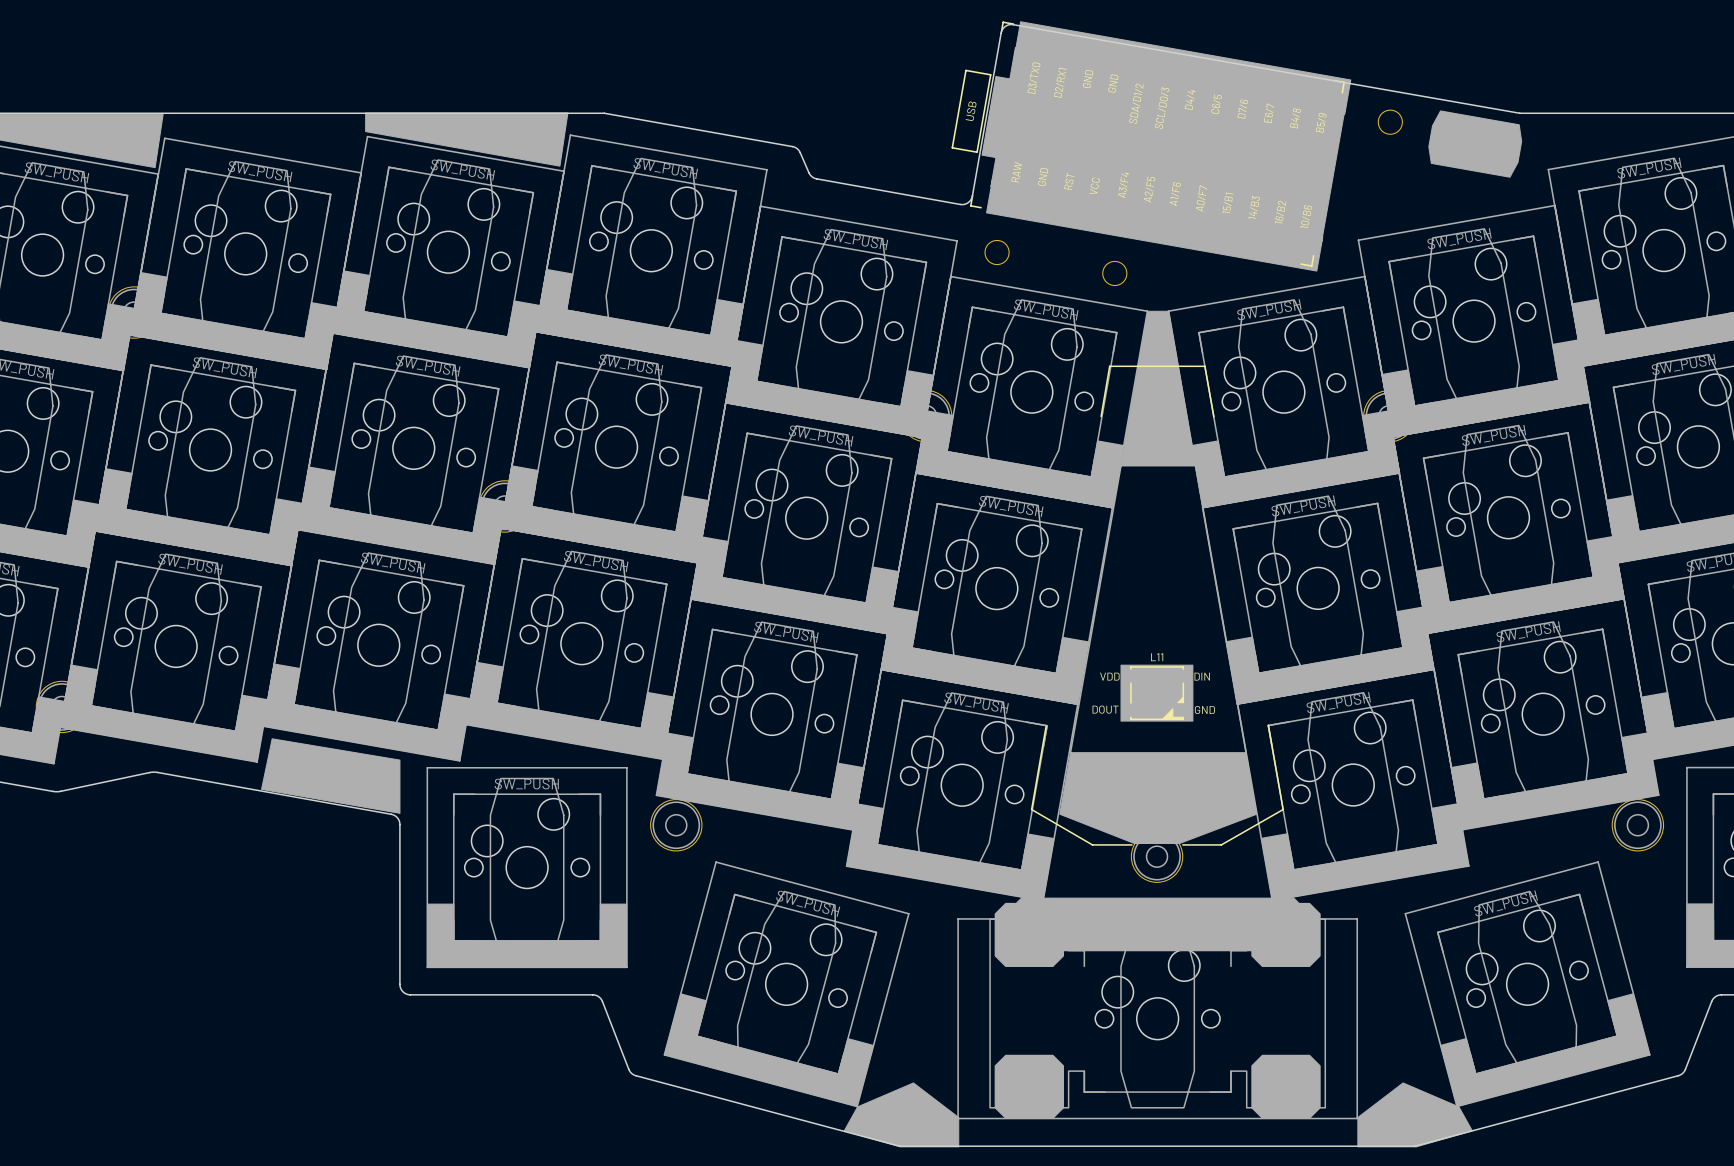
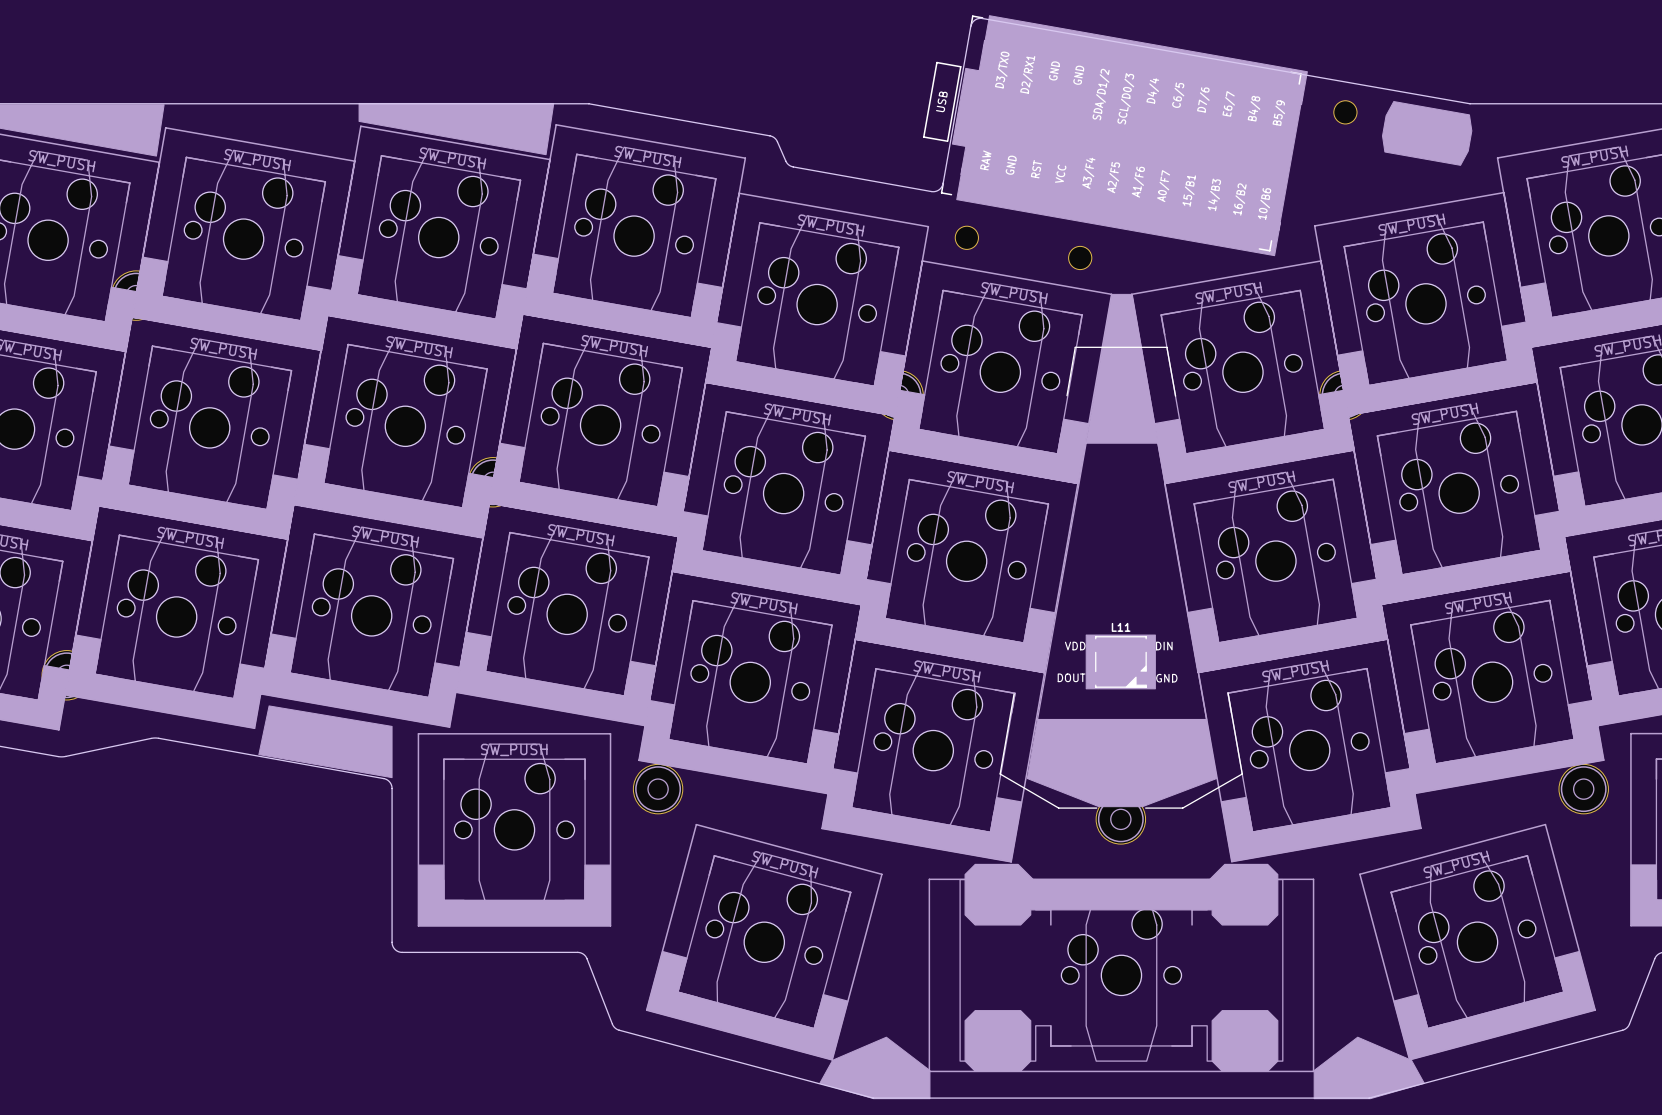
part footprint: [957, 897, 1359, 1120] -> [928, 863, 1315, 1073]

